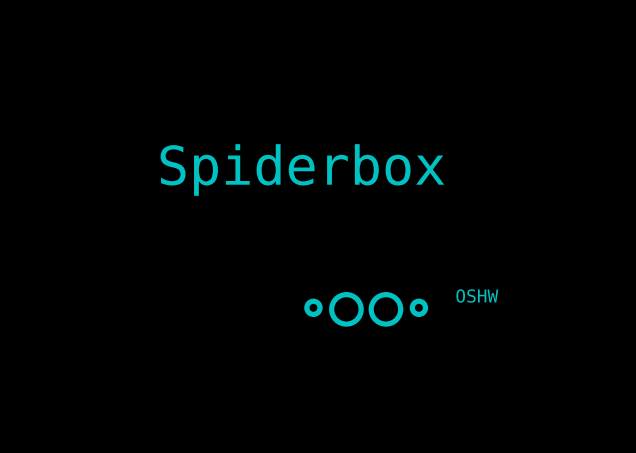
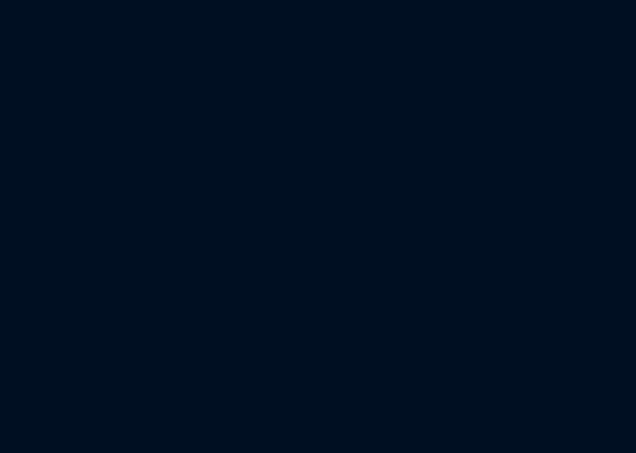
text: Spiderbox (302, 169) -> none
drawing: [304, 292, 429, 327] -> none
text: OSHW (477, 296) -> none

